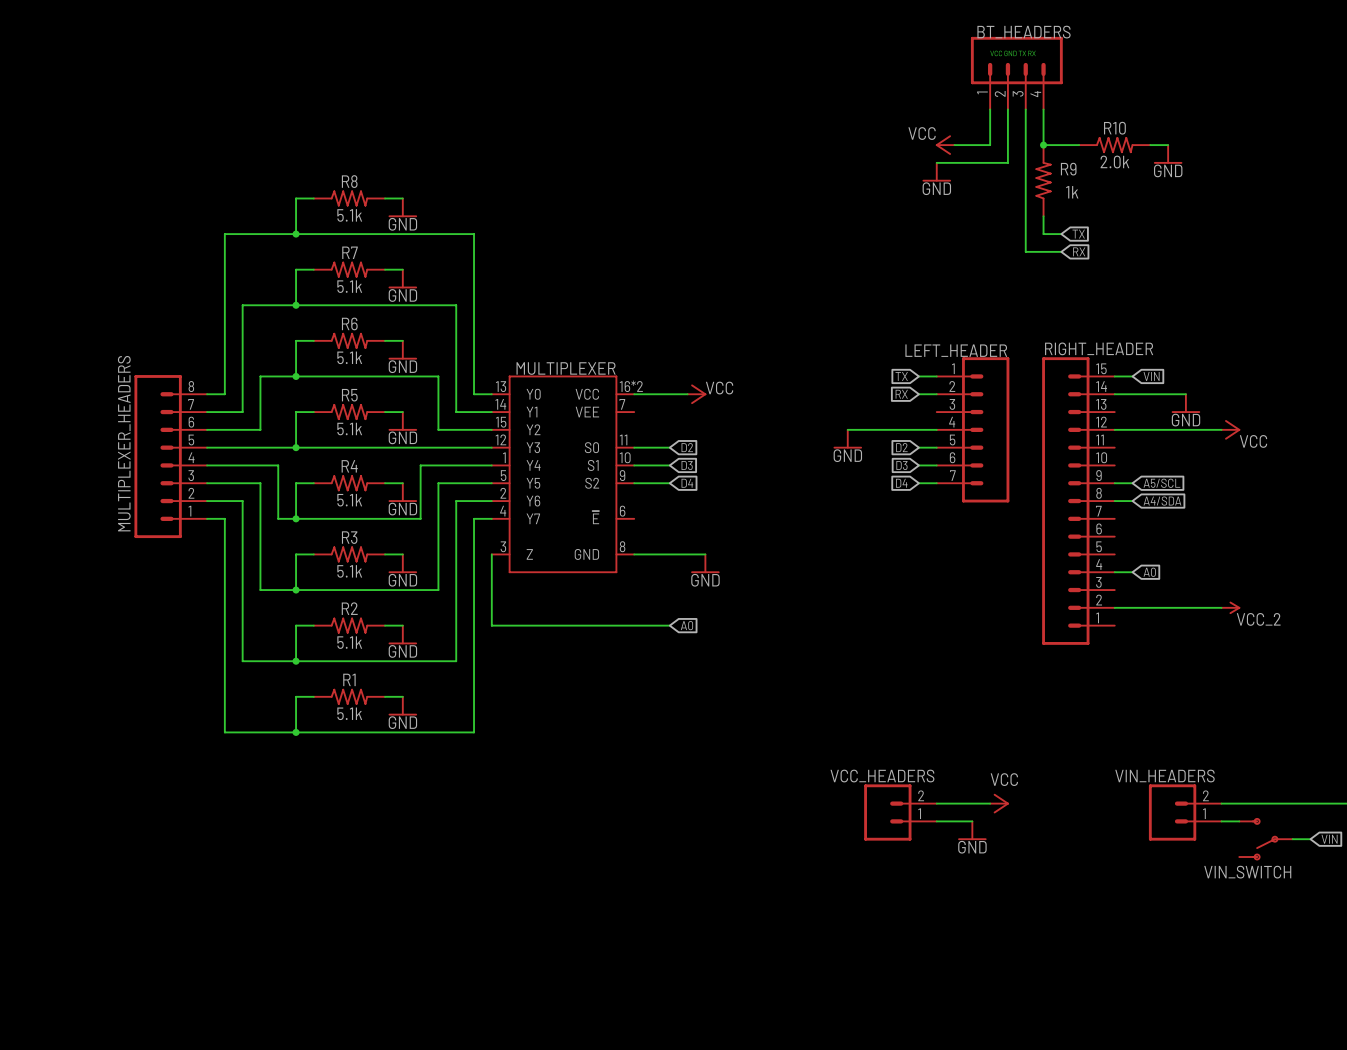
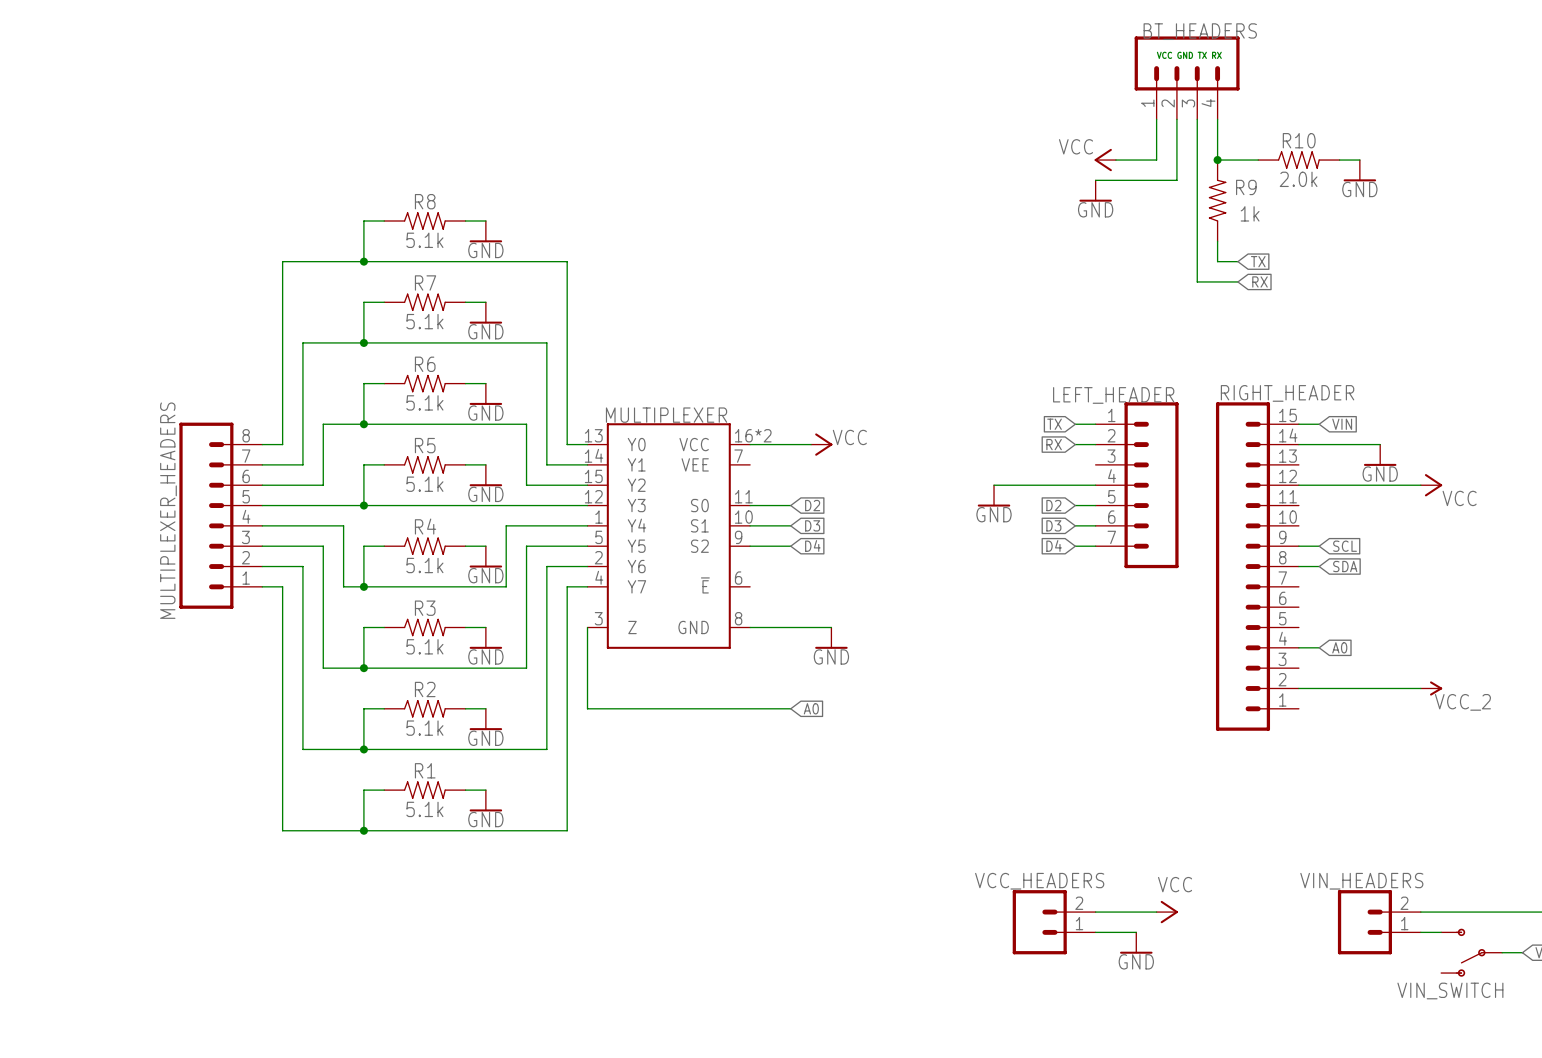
global label: A5/SCL (1161, 483) -> SCL (1345, 546)
global label: A4/SDA (1162, 501) -> SDA (1345, 566)

